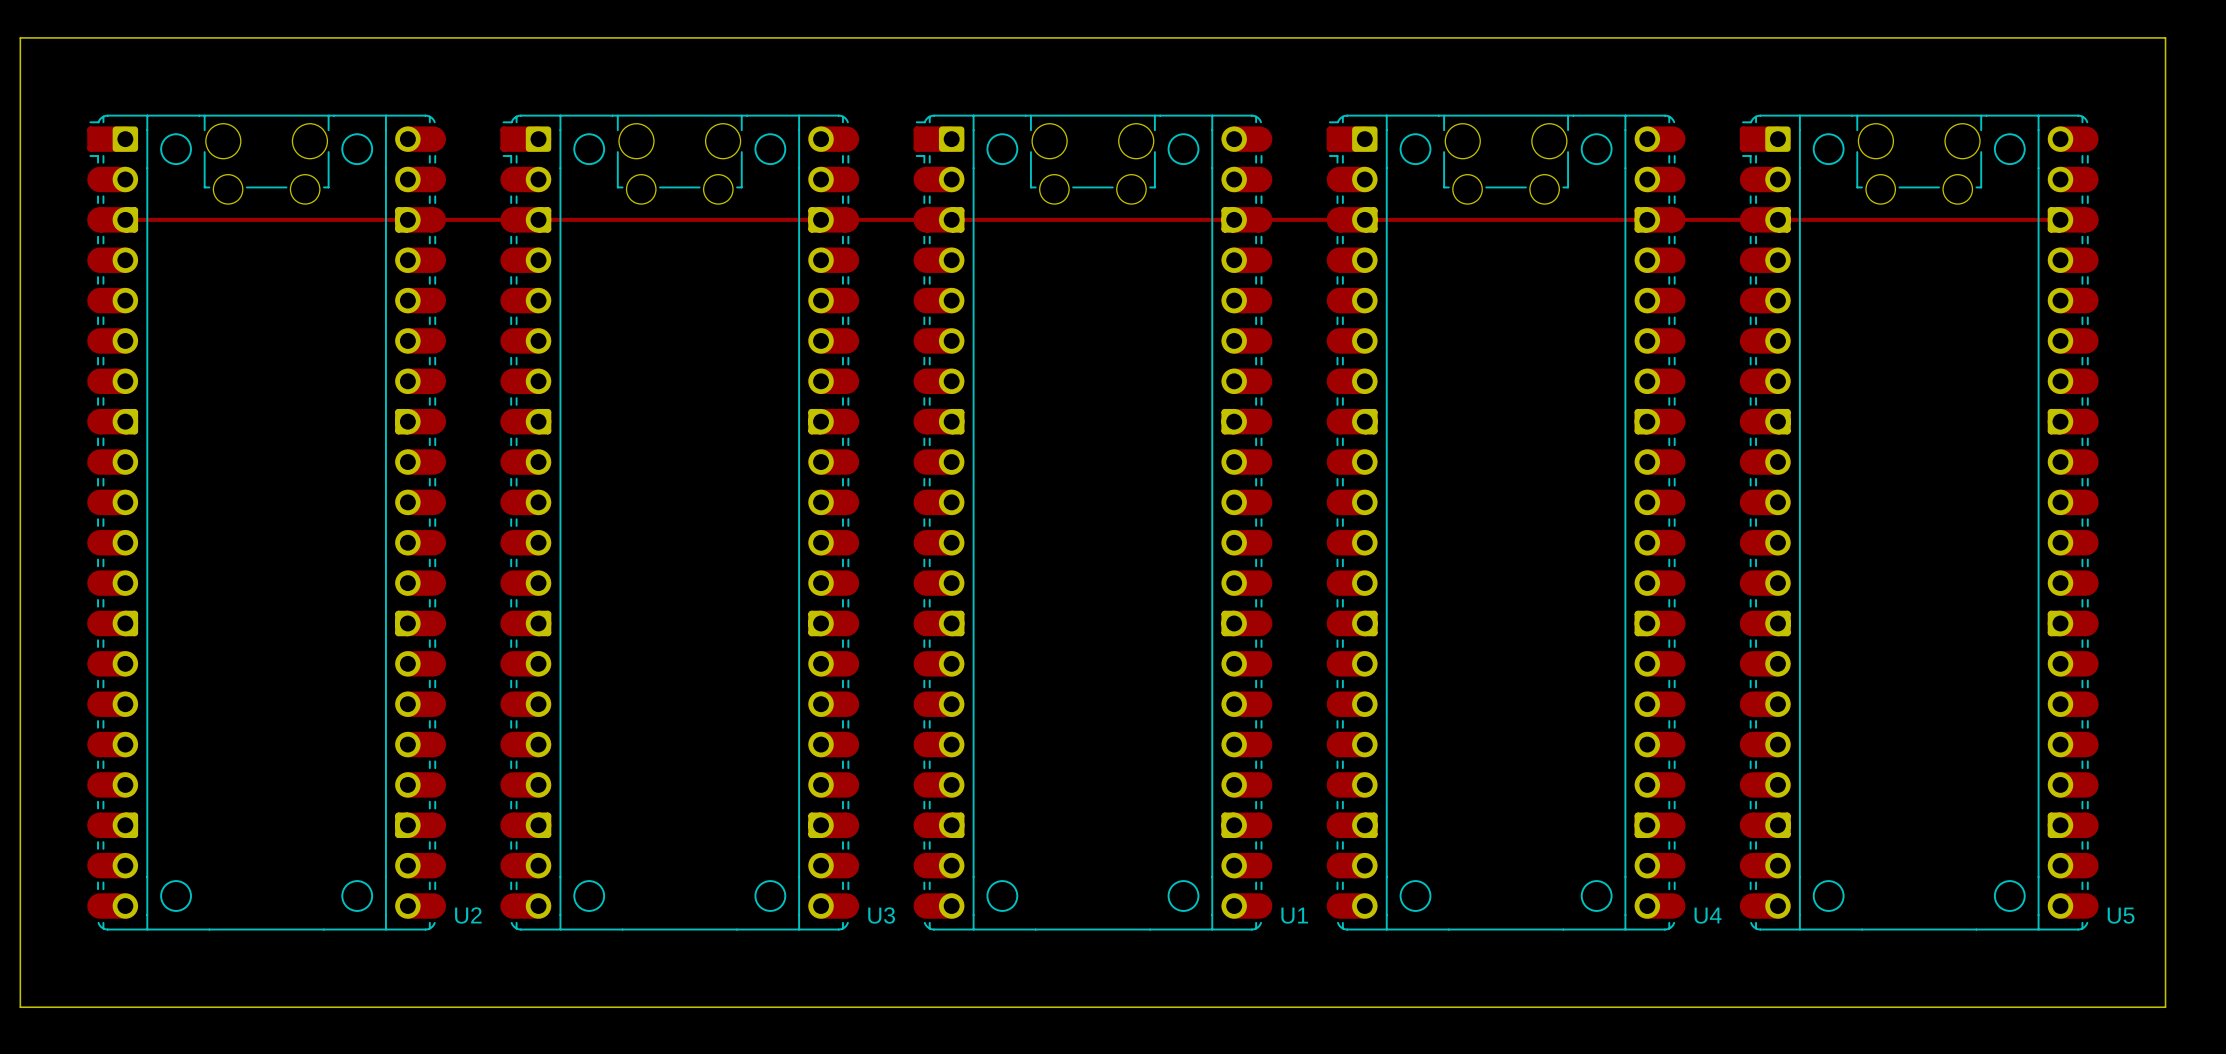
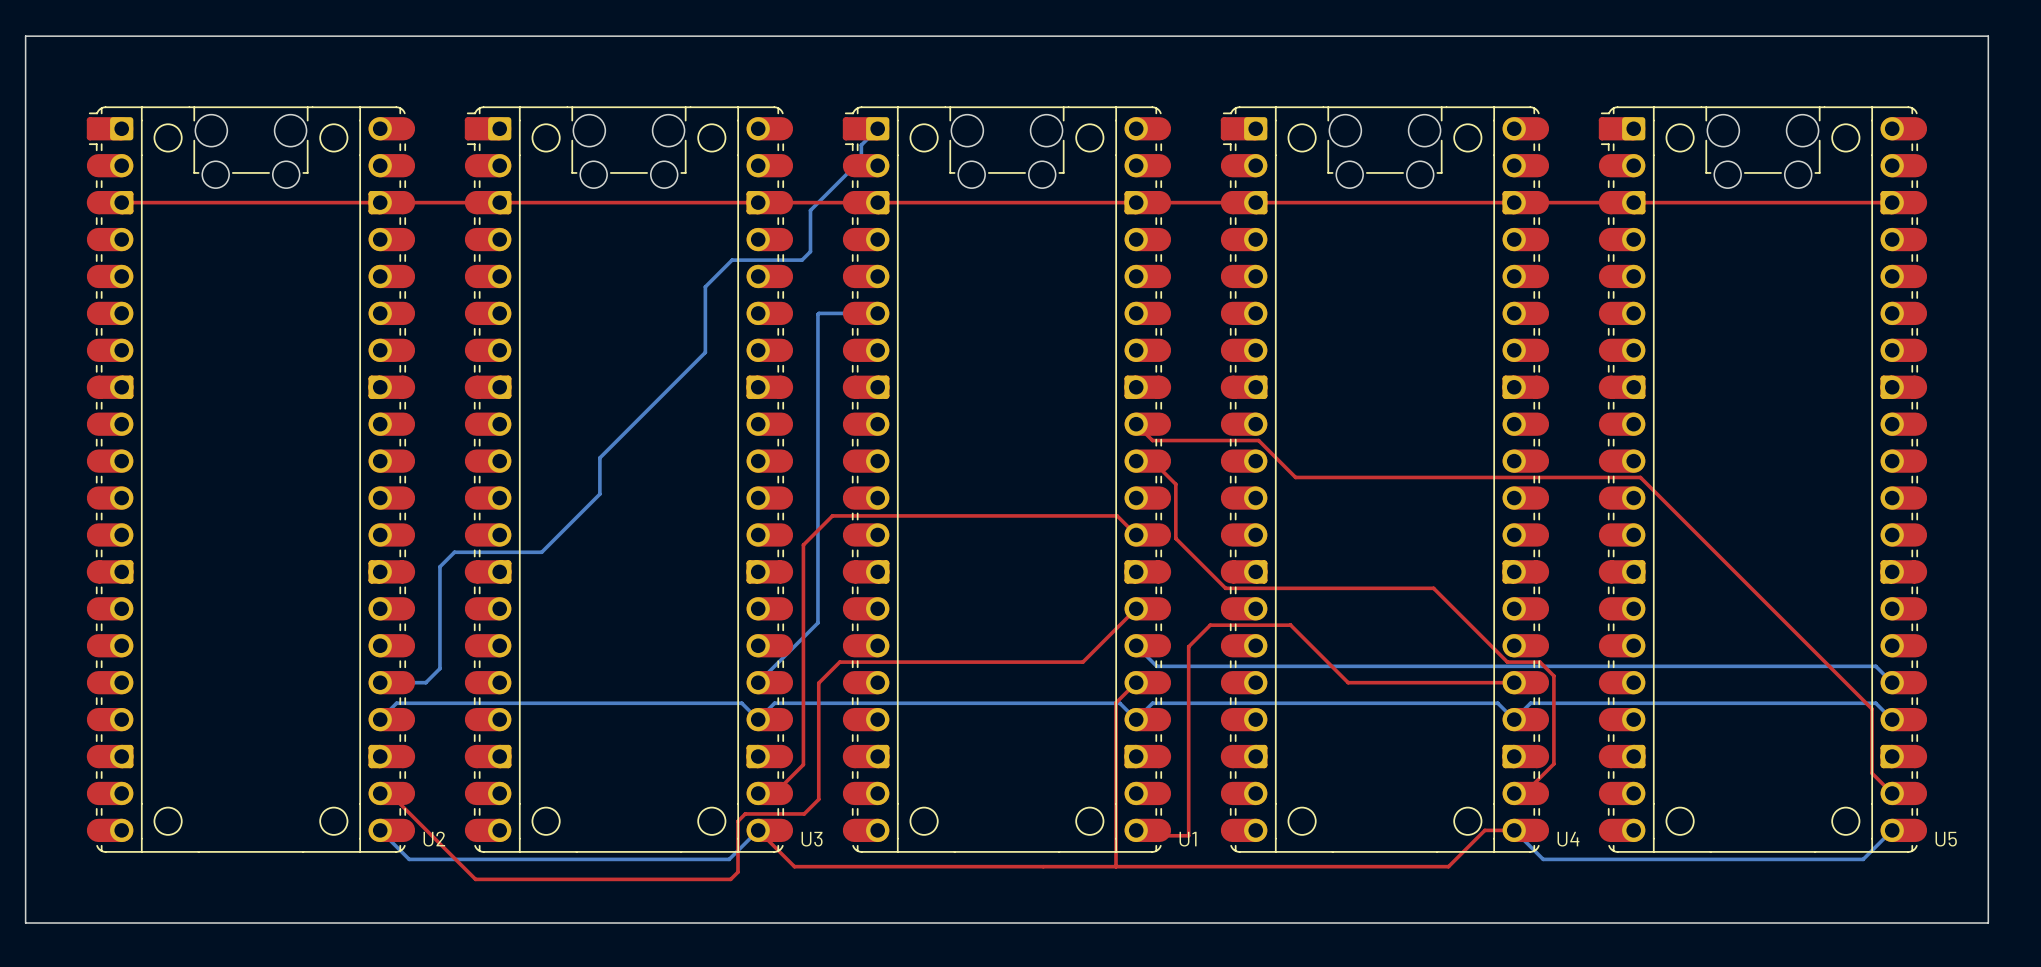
bottom track: none -> (877, 128) (861, 145) (861, 159) (810, 210) (810, 251) (802, 260) (732, 260) (705, 286) (705, 352) (599, 457) (599, 494) (541, 552) (454, 552) (439, 566) (439, 668) (425, 682) (380, 682)
bottom track: none -> (877, 313) (817, 314) (817, 622) (758, 682)
top track: none -> (1136, 424) (1152, 440) (1258, 440) (1295, 477) (1640, 477) (1872, 708) (1872, 773) (1892, 793)
top track: none -> (1136, 461) (1152, 461) (1175, 484) (1175, 538) (1225, 588) (1433, 588) (1507, 662) (1540, 662) (1553, 675) (1553, 763) (1524, 793) (1514, 793)
top track: none -> (1136, 534) (1117, 515) (832, 515) (803, 545) (803, 764) (774, 793) (758, 793)
top track: none -> (1136, 608) (1082, 662) (839, 662) (818, 683) (818, 799) (804, 813) (745, 813) (738, 821) (738, 872) (730, 879) (475, 879) (389, 793) (380, 793)
bottom track: none -> (1136, 645) (1156, 666) (1875, 666) (1892, 682)
top track: none -> (1136, 682) (1116, 702) (1116, 866)
top track: none -> (1514, 682) (1348, 682) (1290, 624) (1210, 625) (1188, 646) (1188, 835) (1141, 835) (1136, 830) (1148, 830)
bottom track: none -> (380, 719) (396, 703) (741, 703) (758, 719) (774, 703) (1119, 703) (1136, 719) (1152, 703) (1497, 703) (1514, 719) (1530, 703) (1875, 703) (1892, 719)
bottom track: none -> (380, 830) (409, 859) (729, 859) (758, 830)
top track: none -> (758, 830) (794, 866) (1448, 866) (1484, 830) (1514, 830)
bottom track: none -> (1514, 830) (1543, 859) (1863, 859) (1892, 830)

